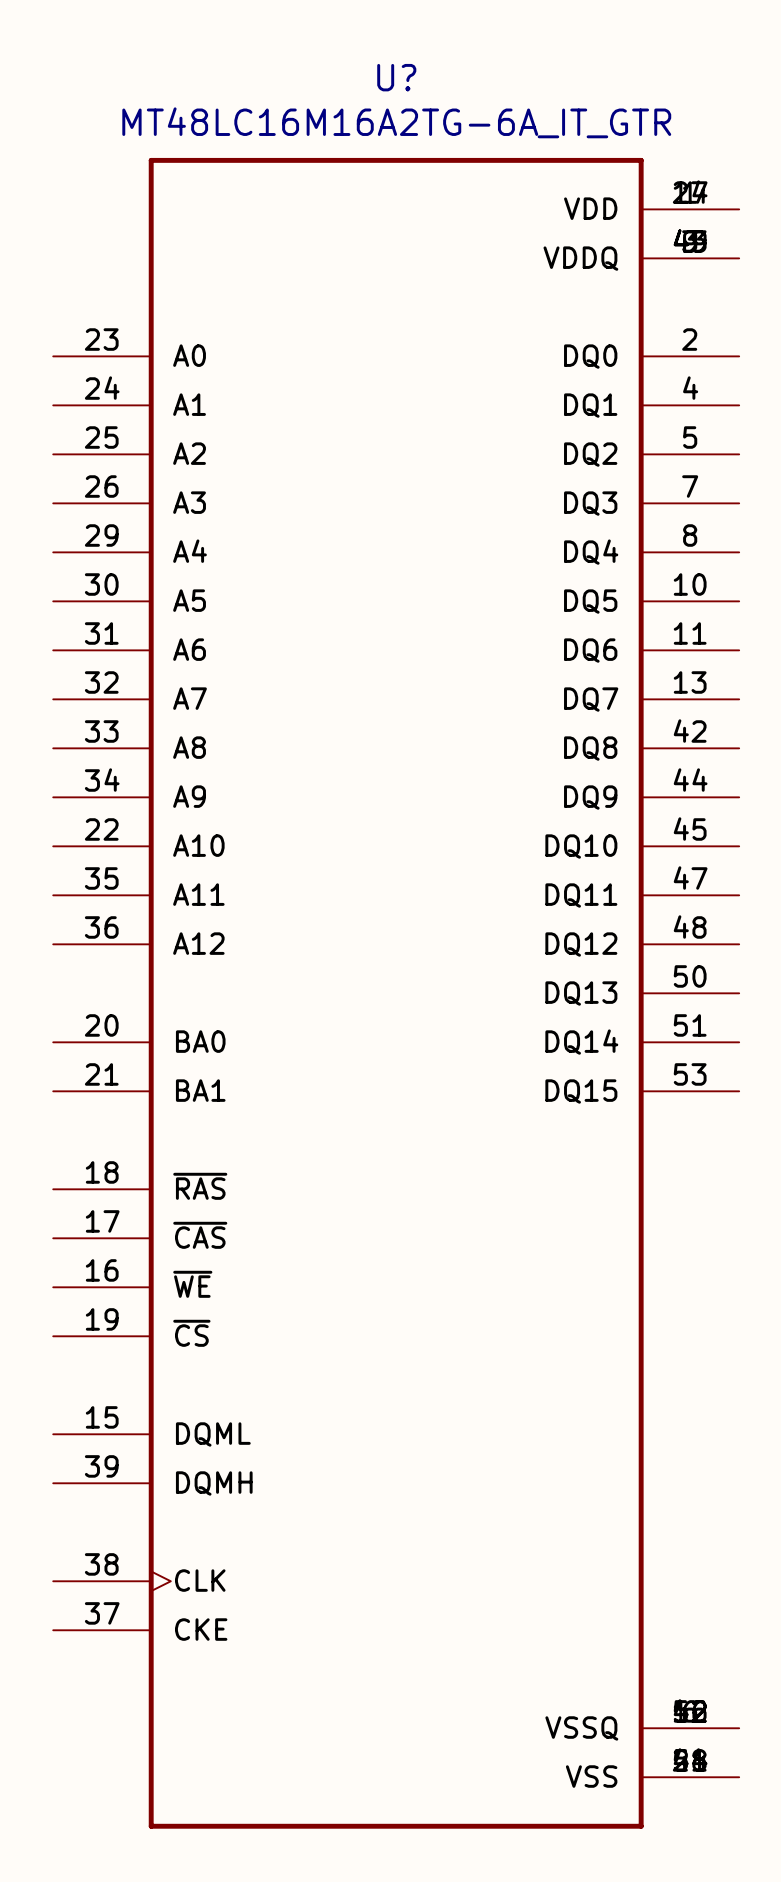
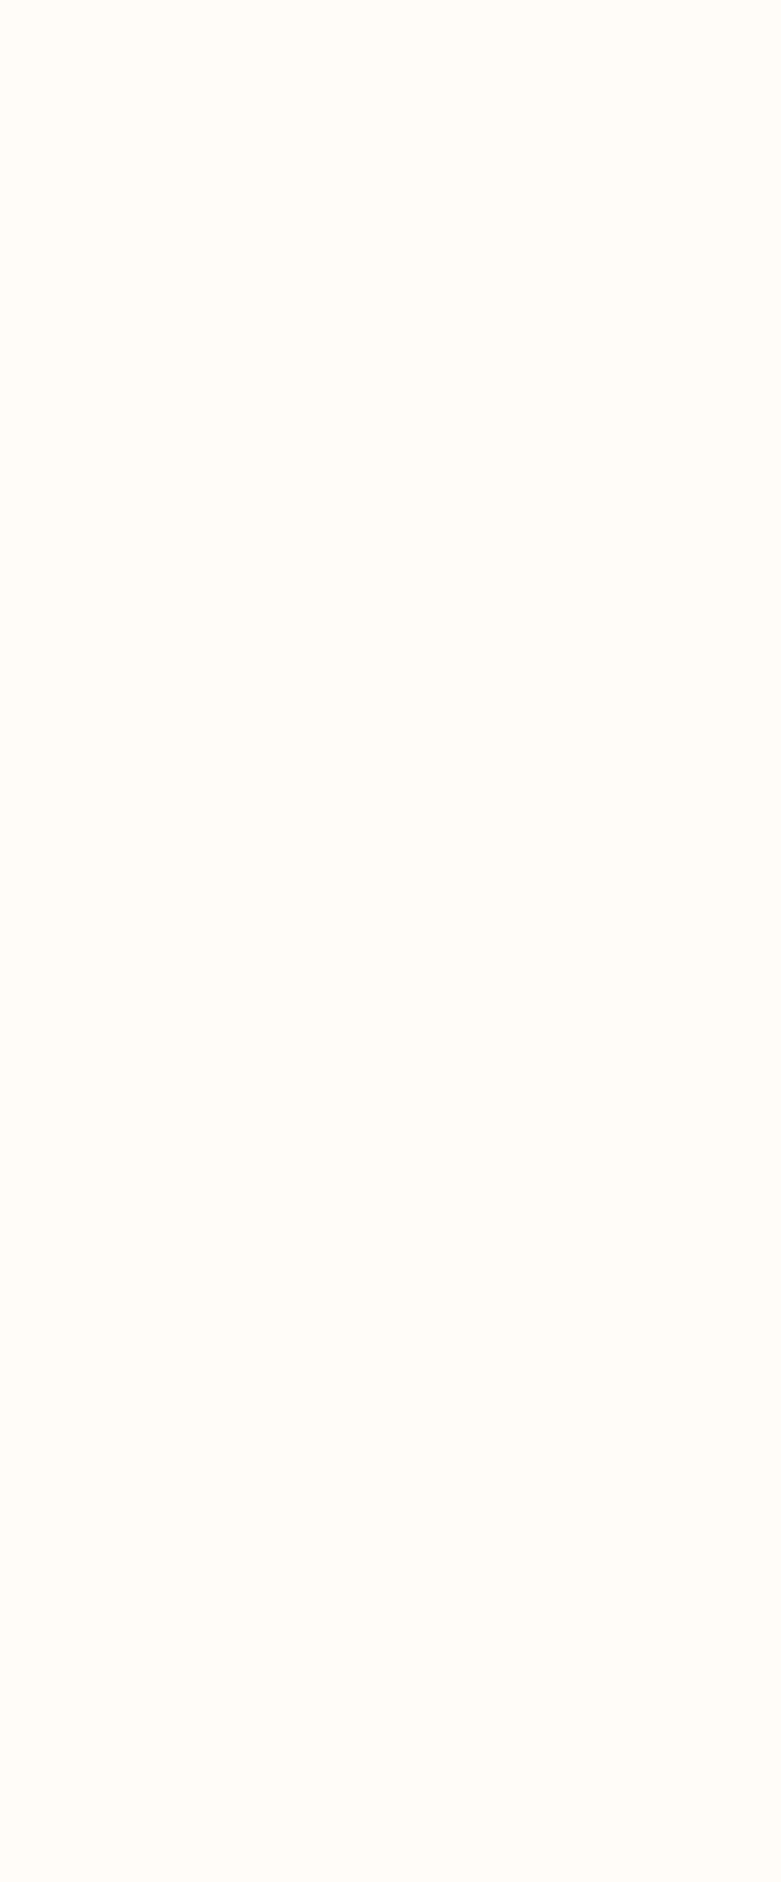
U?: MT48LC16M16A2TG-6A_IT_GTR (396, 993) -> none

